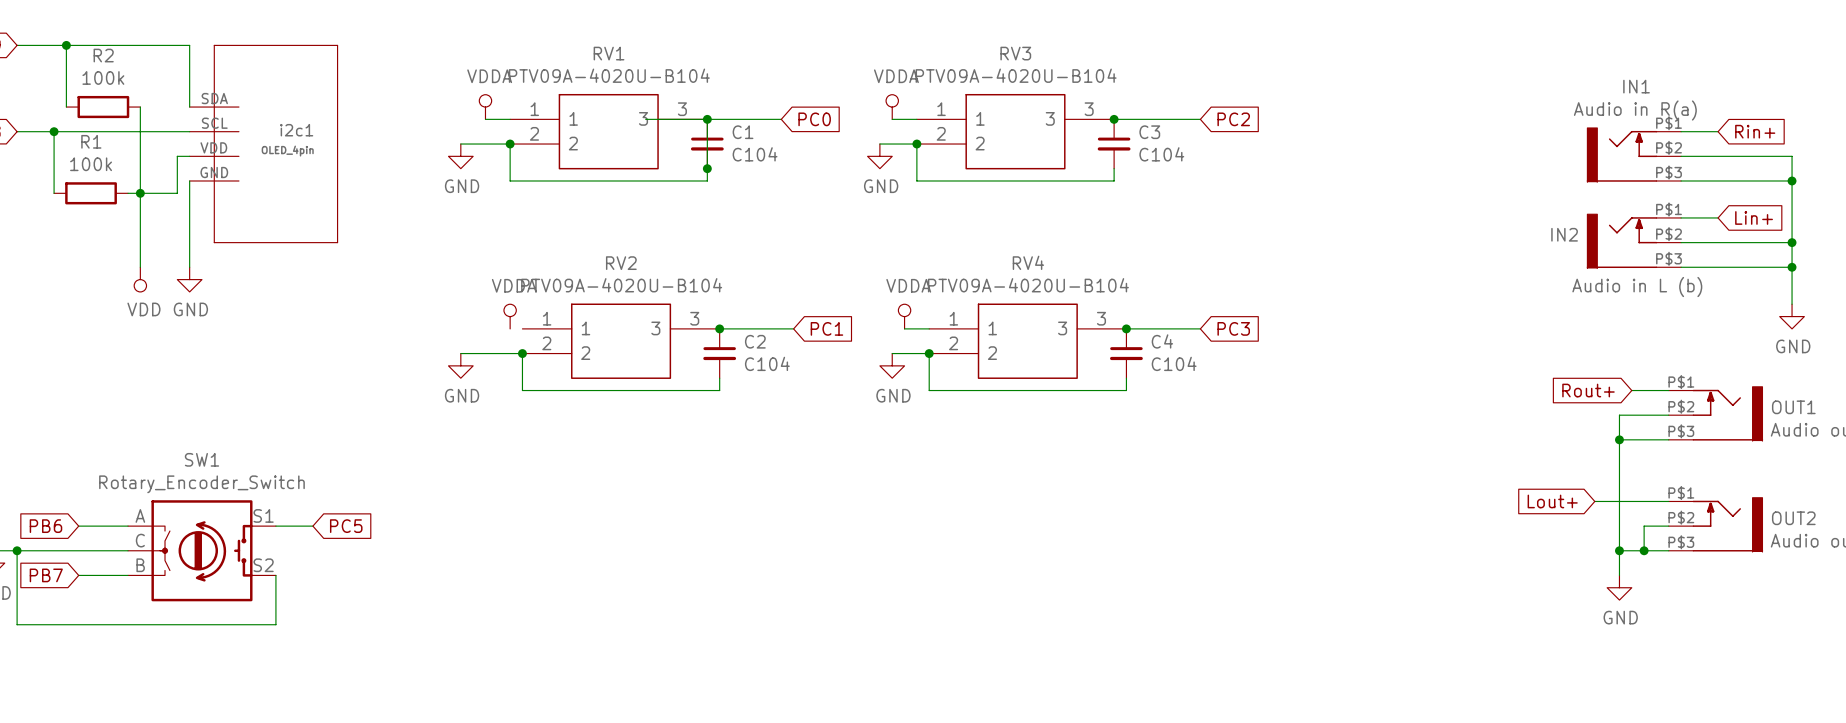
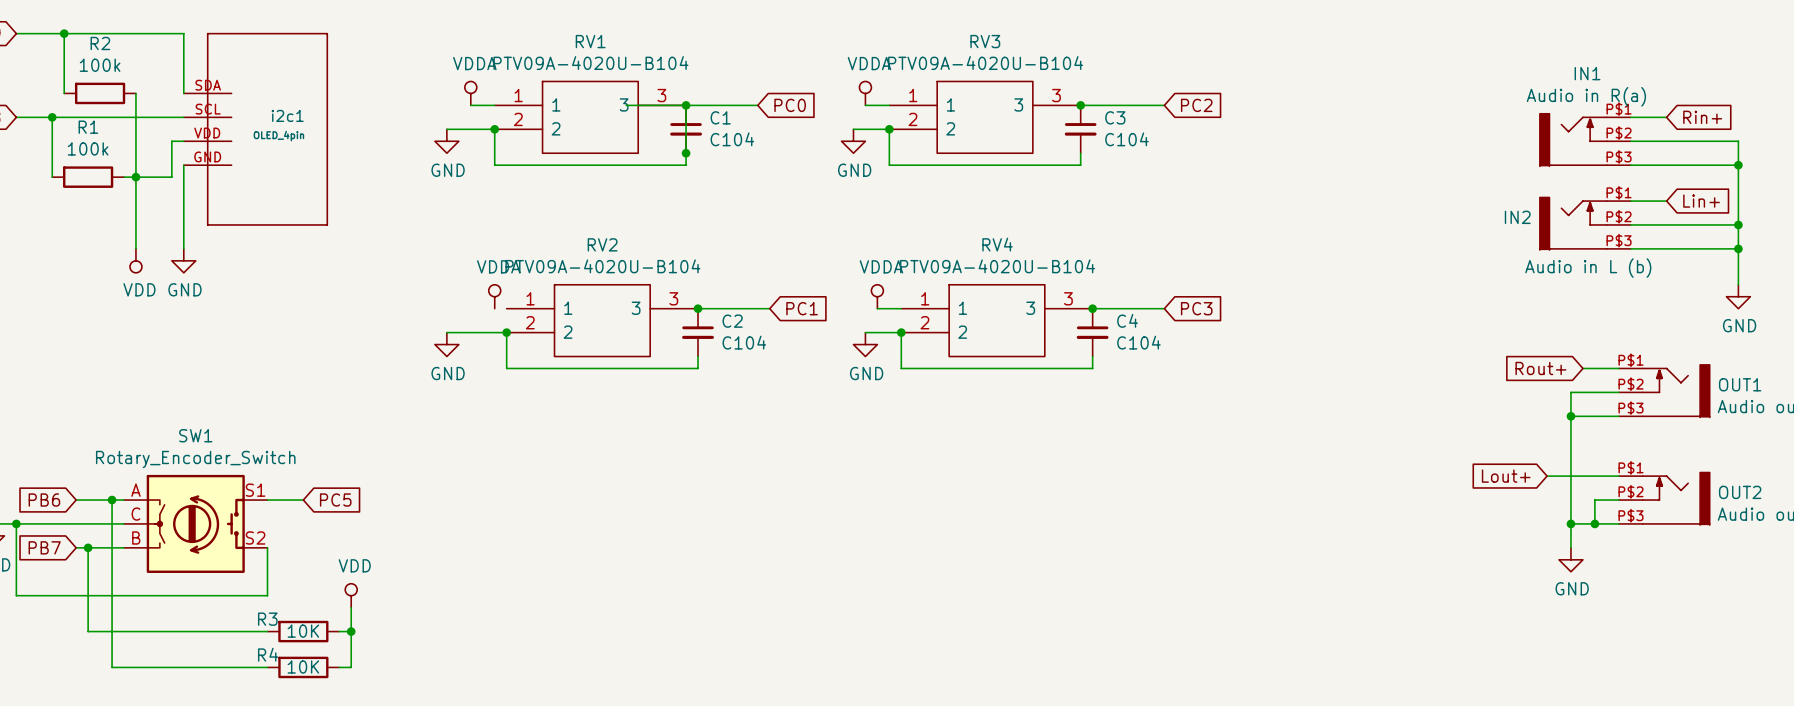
wire: none -> (112, 500) (112, 667) (267, 667)
junction: none -> (112, 500)
wire: none -> (88, 547) (88, 631) (267, 631)
junction: none -> (88, 547)
power symbol: none -> VDD (351, 595)
wire: none -> (351, 607) (351, 667) (339, 667)
R3: none -> 10K (303, 631)
wire: none -> (339, 631) (351, 631)
junction: none -> (351, 631)
R4: none -> 10K (303, 667)

